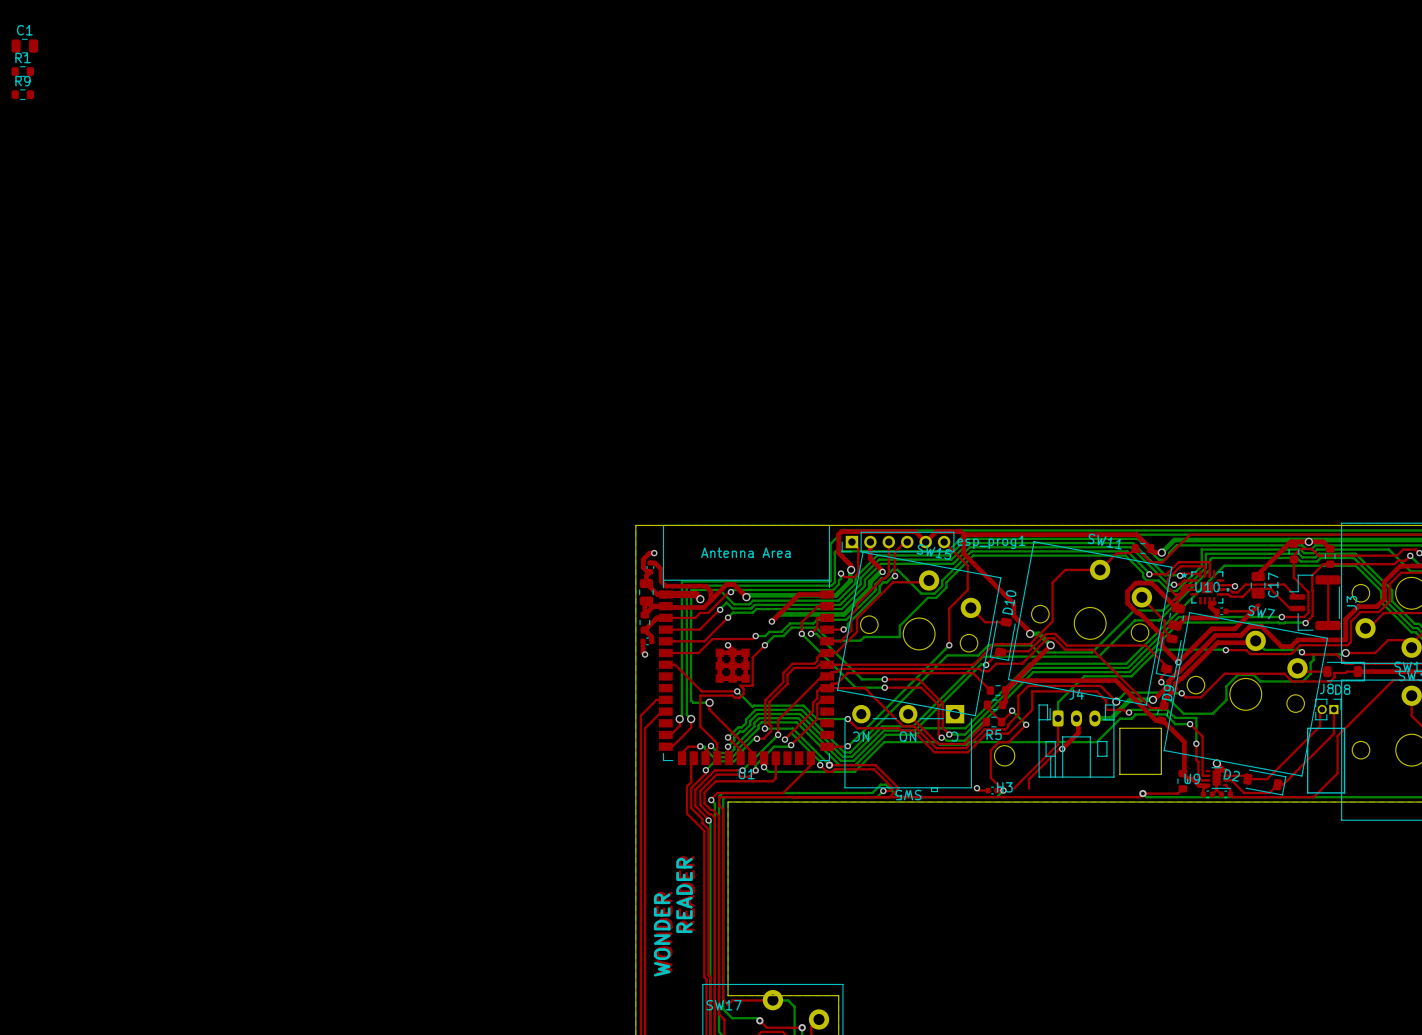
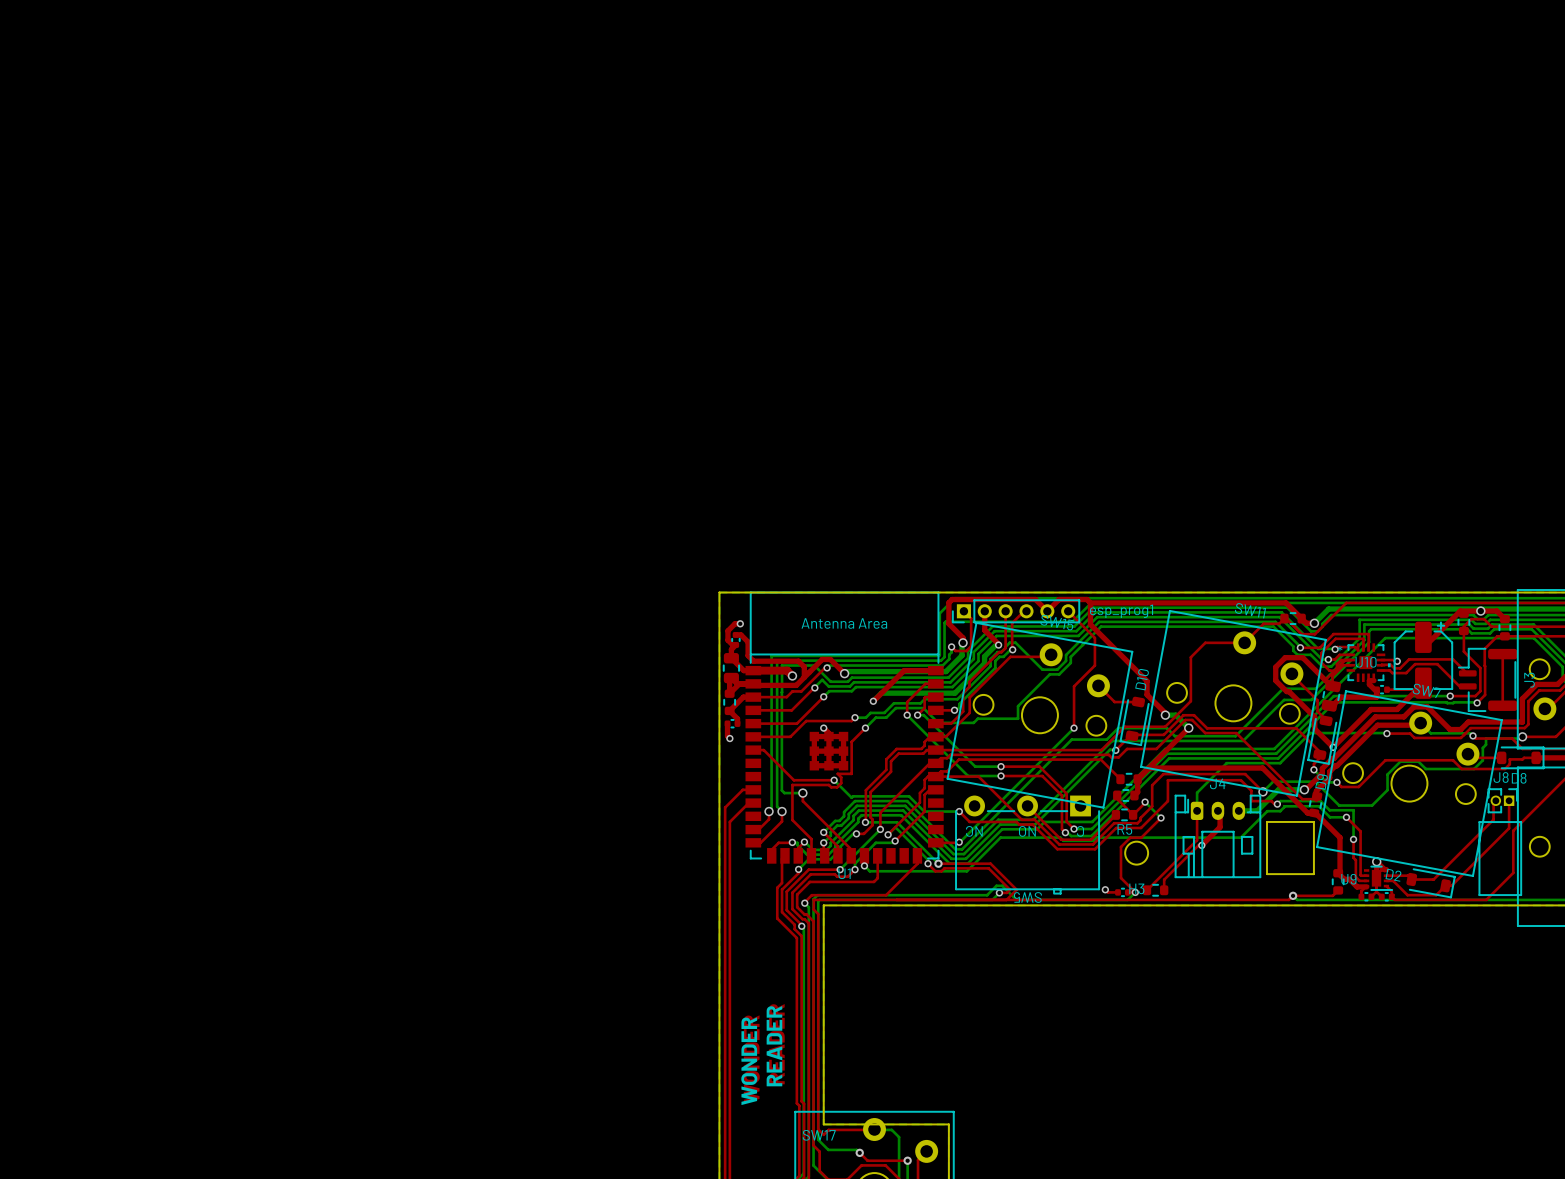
C1: (24, 46) -> none
R1: (22, 71) -> none
R9: (22, 94) -> none
C17: (1258, 585) -> none
part: none -> (1423, 660)
part: none -> (1155, 890)

